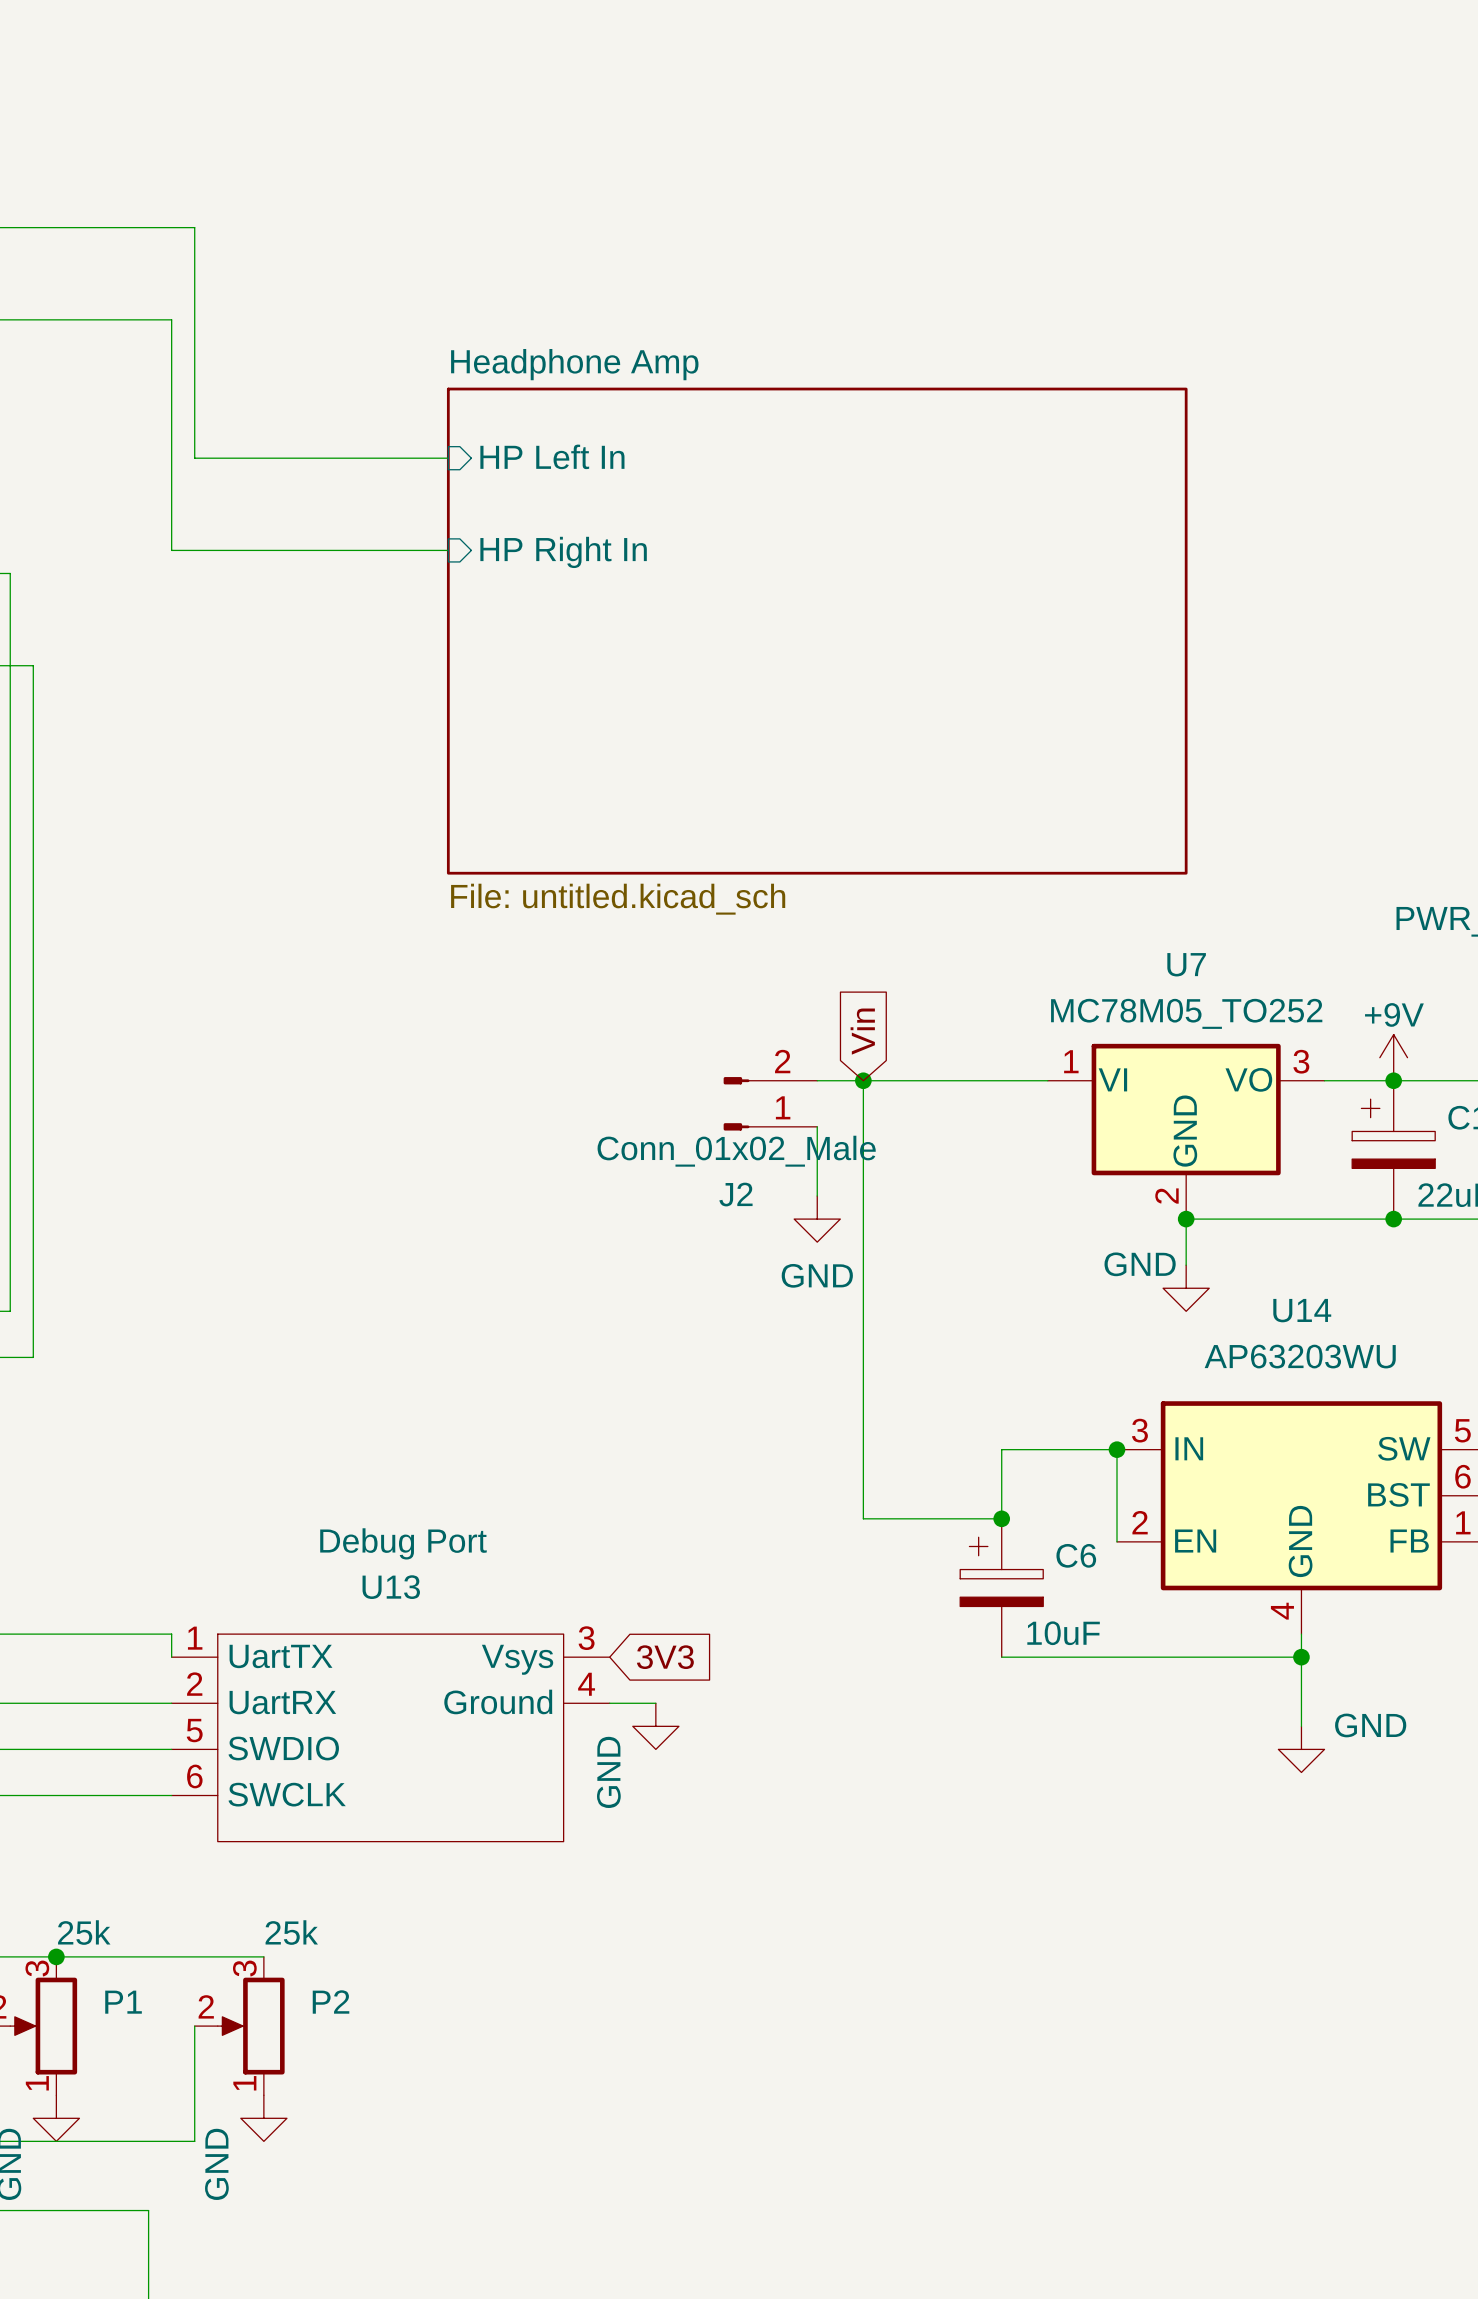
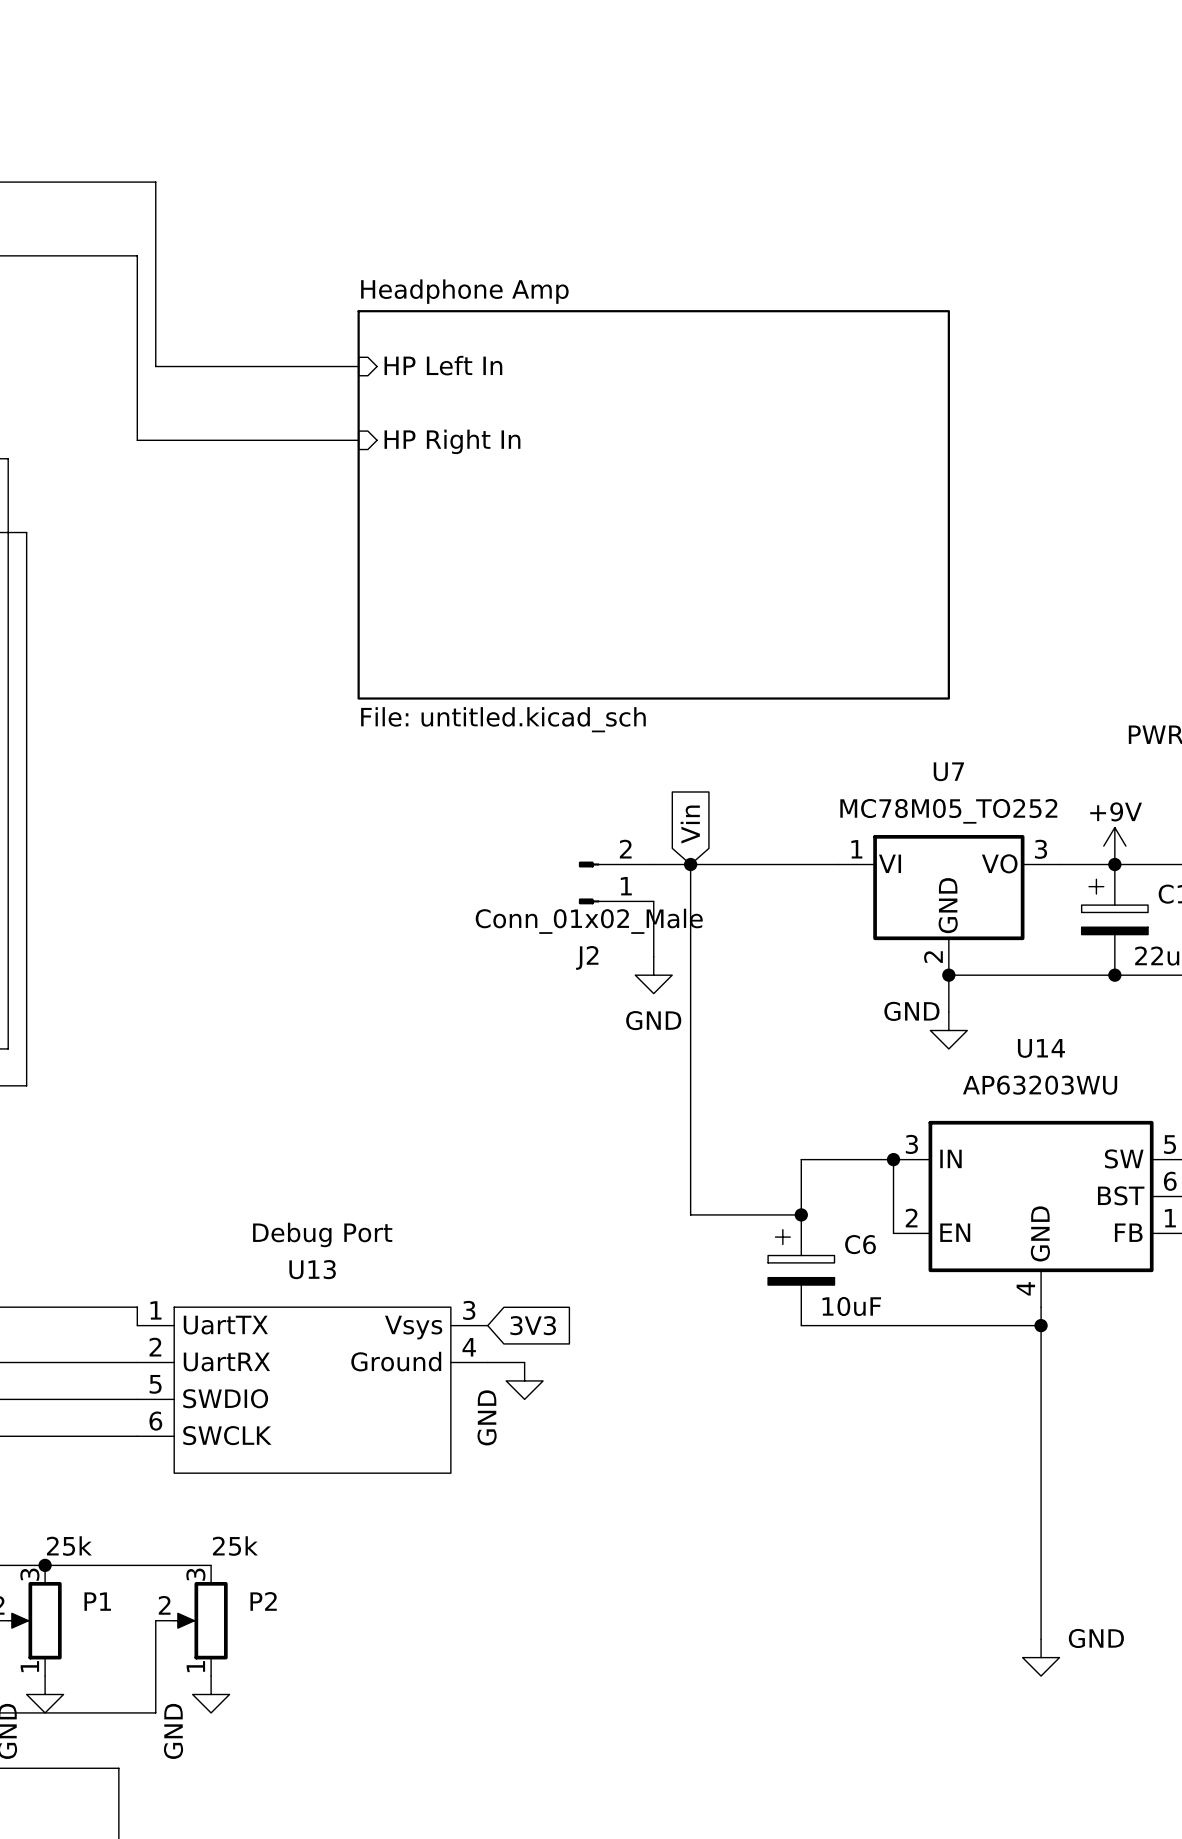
wire: none -> (1041, 1380) (1041, 1639)
power symbol position: GND (1301, 1749) -> GND (1041, 1657)

